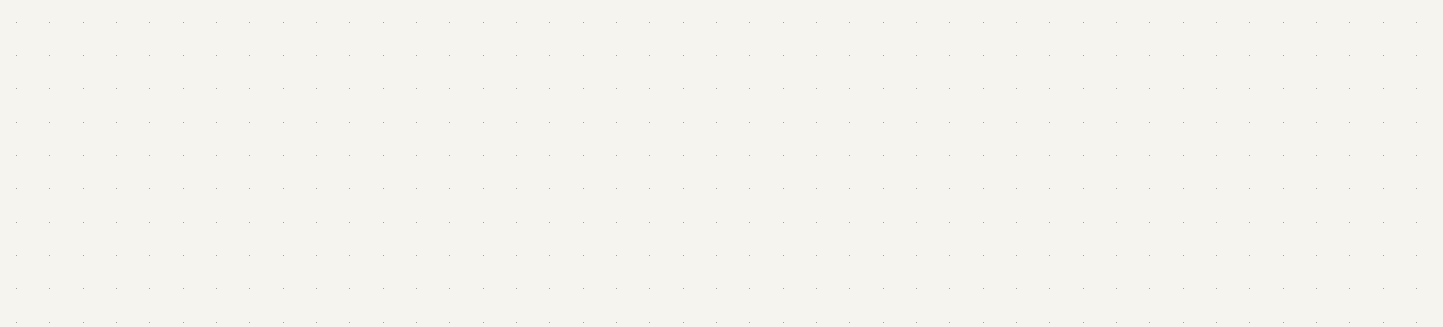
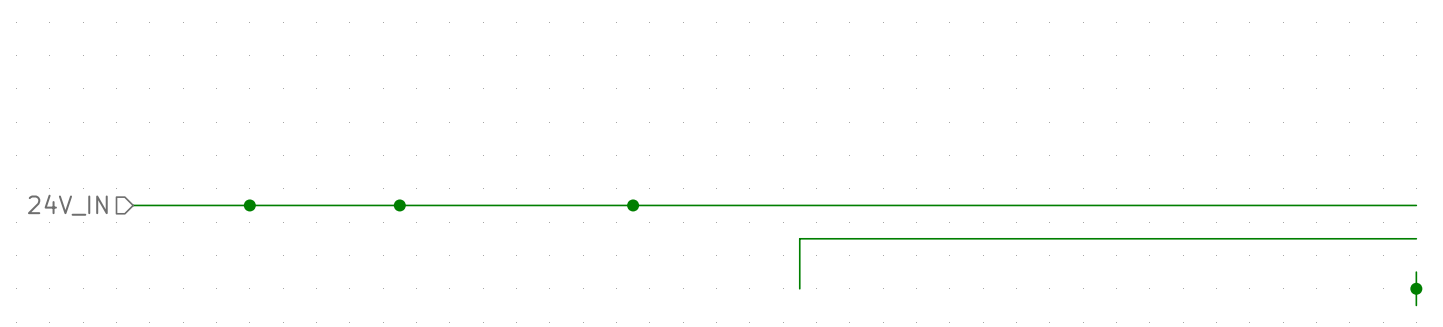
hierarchical label: none -> 24V_IN (67, 205)
wire: none -> (133, 205) (1416, 205)
junction: none -> (249, 205)
junction: none -> (399, 205)
junction: none -> (633, 205)
wire: none -> (1416, 238) (799, 238) (799, 288)
wire: none -> (1416, 272) (1416, 305)
junction: none -> (1416, 288)

